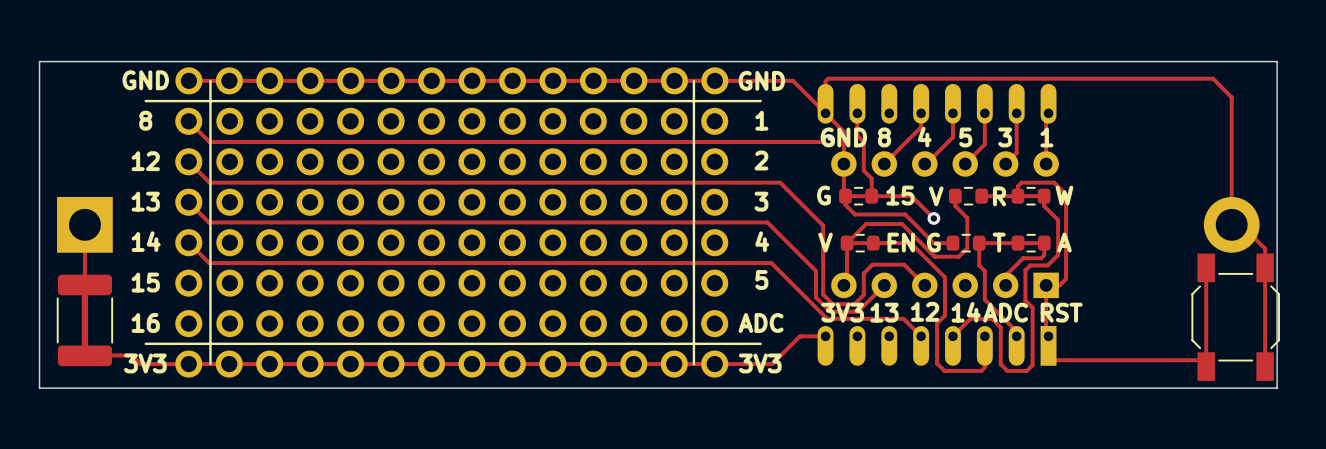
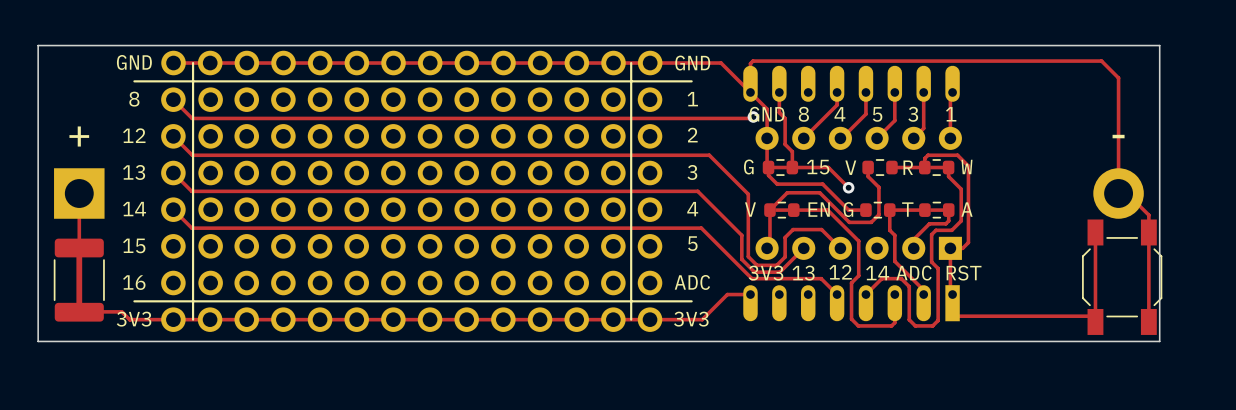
text: none -> + (79, 136)
text: none -> - (1118, 136)

